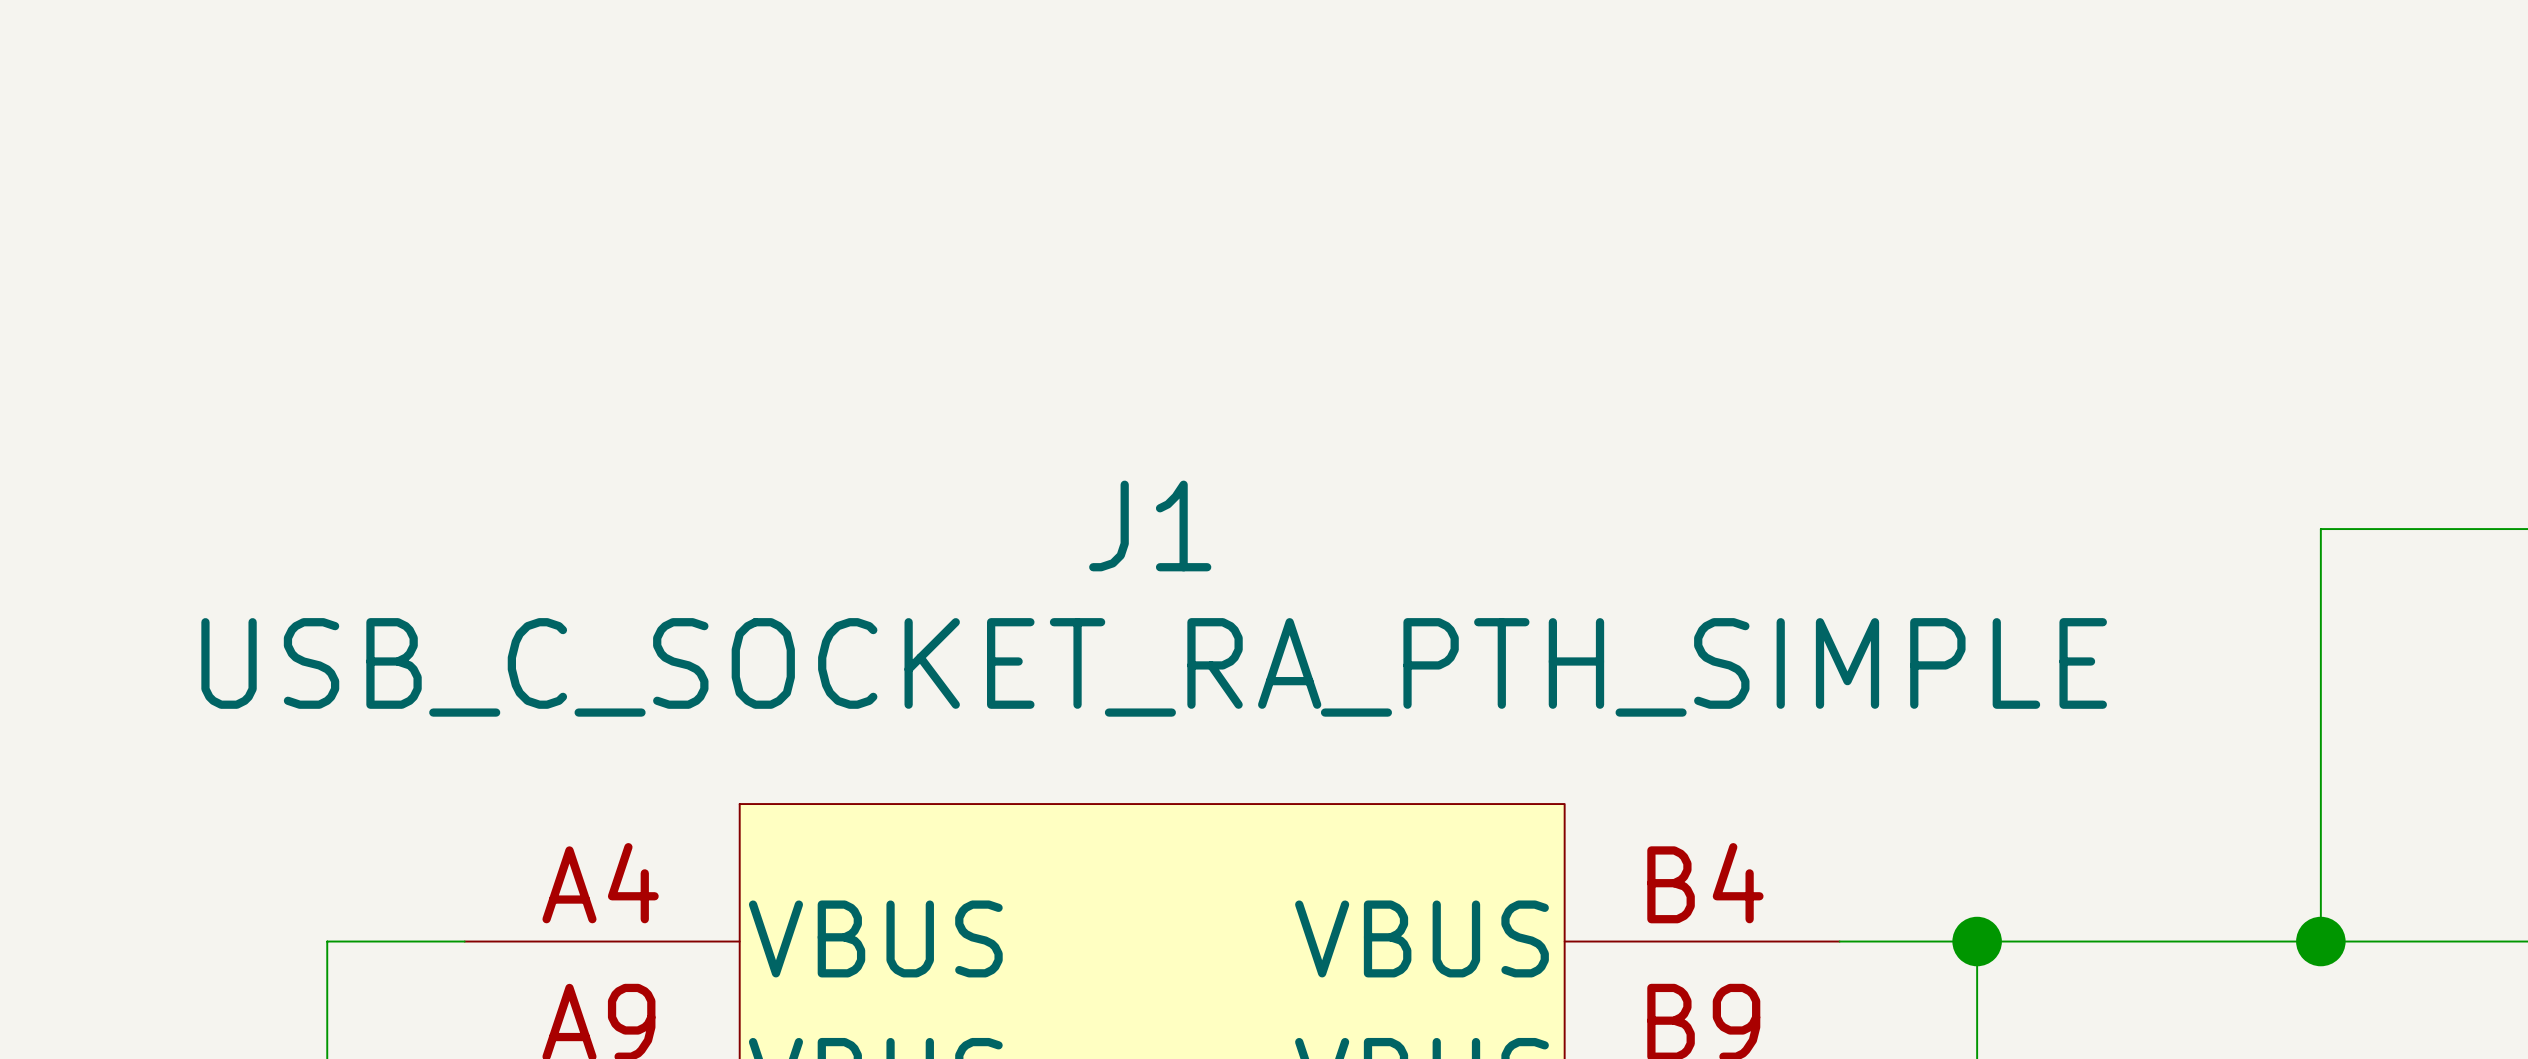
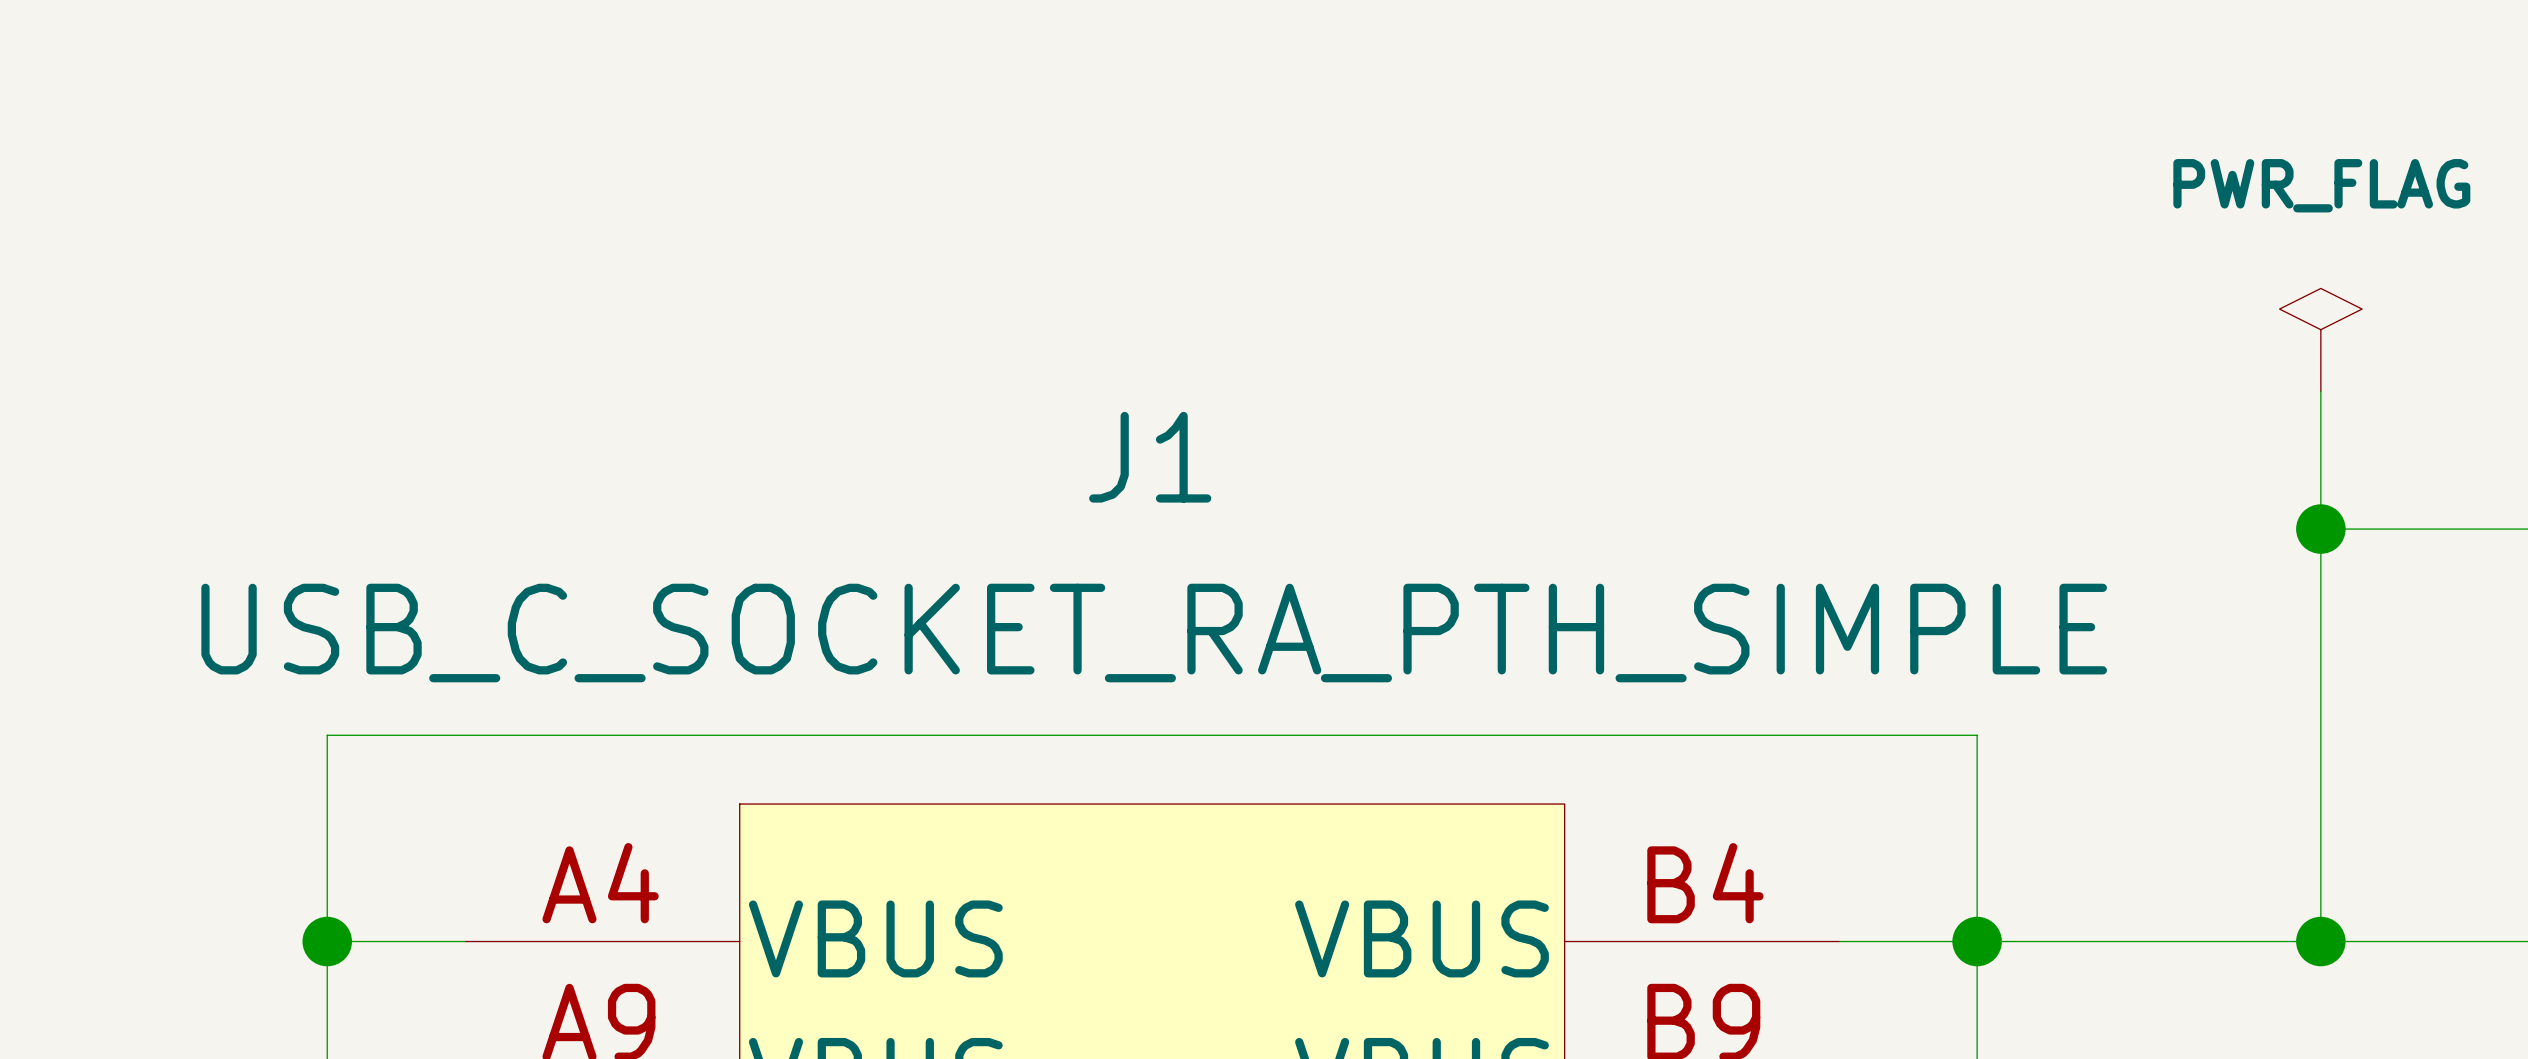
power symbol: none -> PWR_FLAG (2320, 340)
wire: none -> (2320, 391) (2320, 529)
J1 name position: J1 (1150, 525) -> J1 (1150, 457)
junction: none -> (2320, 529)
J1 value position: USB_C_SOCKET_RA_PTH_SIMPLE (1154, 667) -> USB_C_SOCKET_RA_PTH_SIMPLE (1154, 633)
wire: none -> (327, 941) (327, 735) (1977, 735) (1977, 941)
junction: none -> (327, 941)

